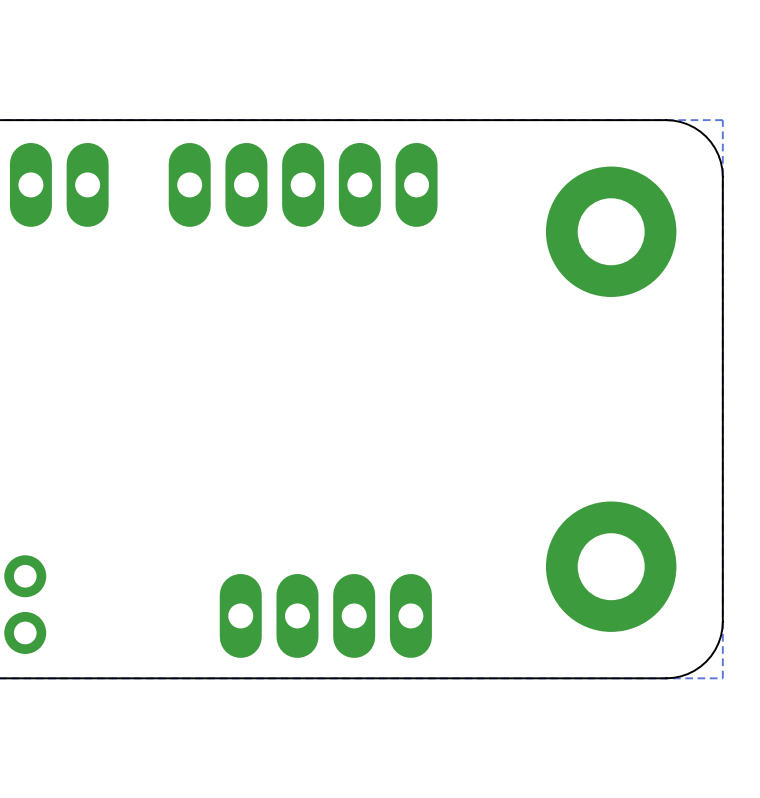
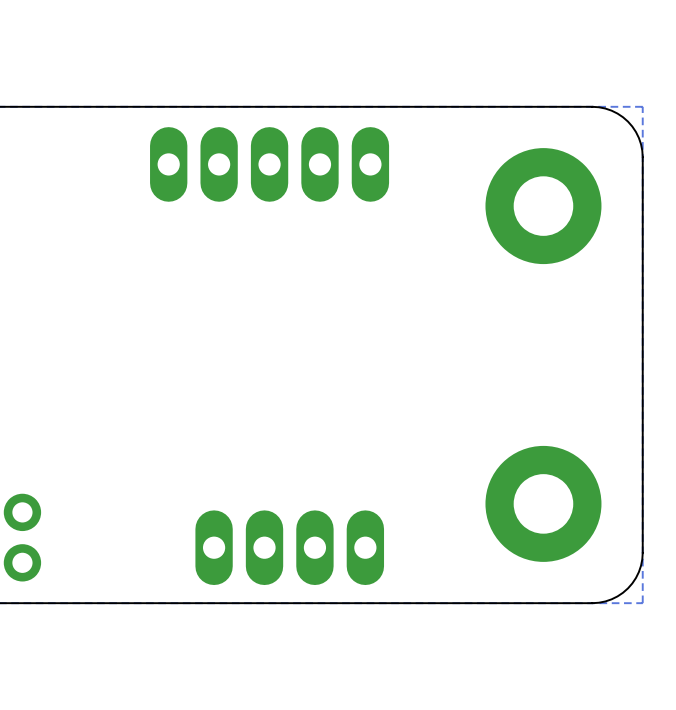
part: (59, 184) -> none

